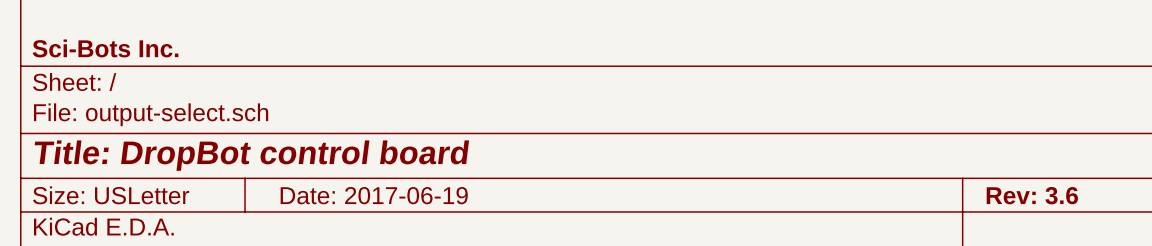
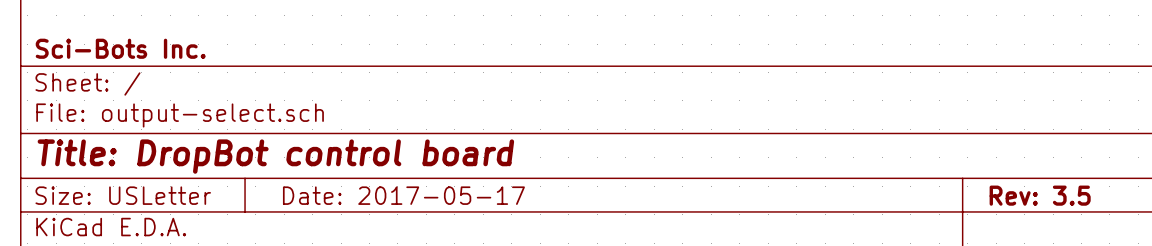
title block: Date: 2017-06-19 (374, 195) -> Date: 2017-05-17 (403, 195)
title block: Rev: 3.6 (1032, 195) -> Rev: 3.5 (1040, 195)

